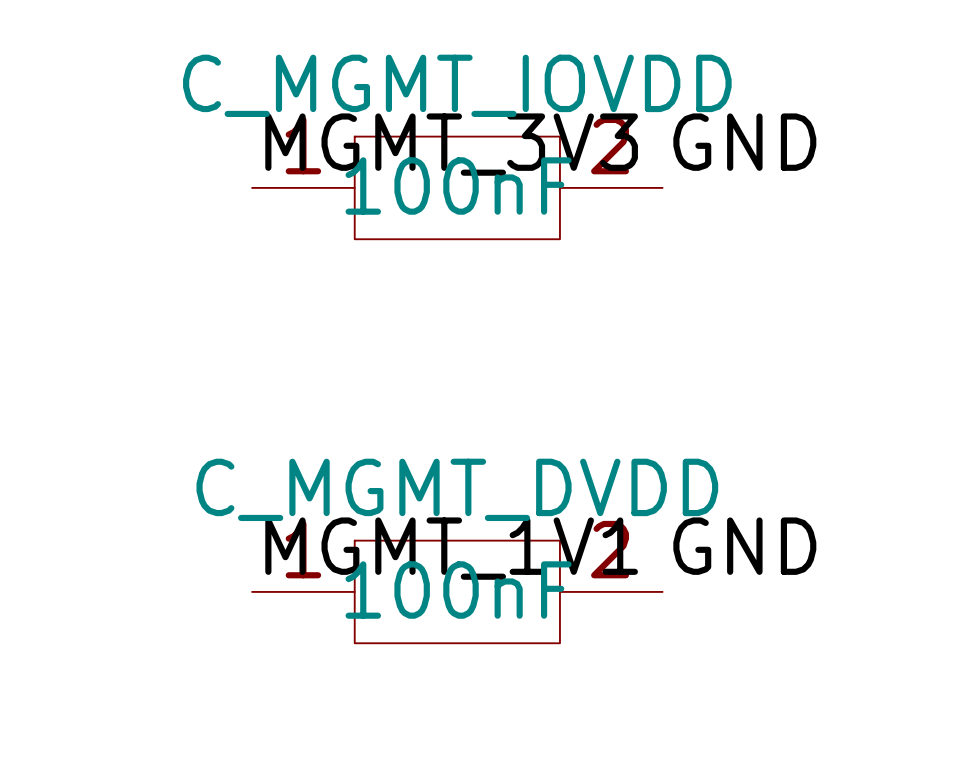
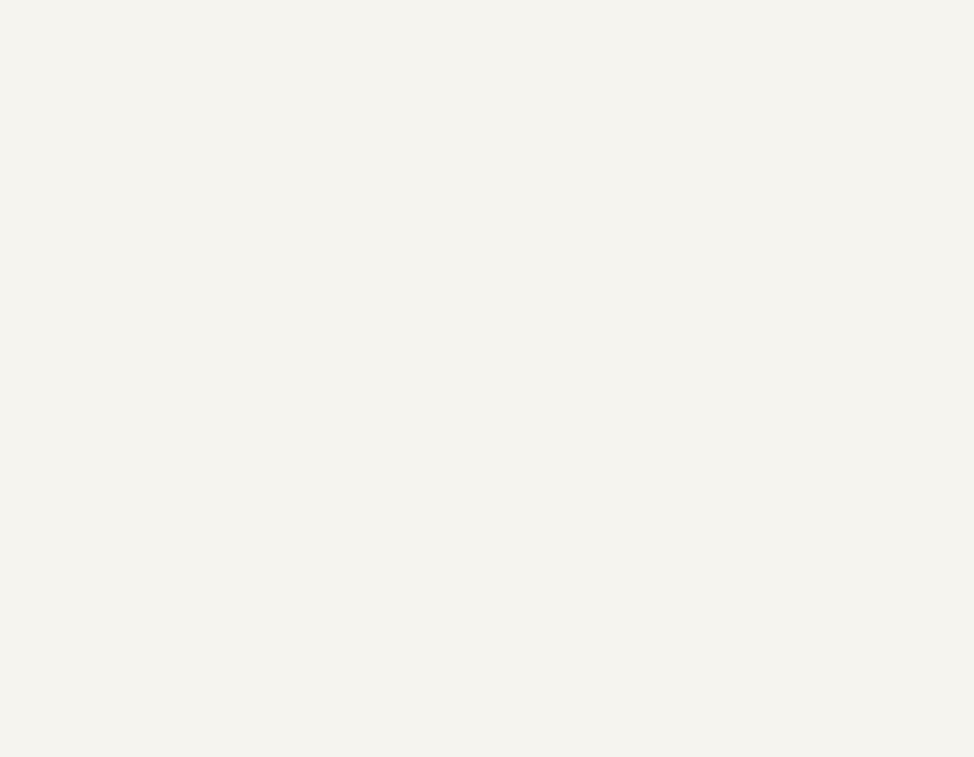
label: GND (744, 142) -> none
label: MGMT_3V3 (451, 144) -> none
C_MGMT_IOVDD: 100nF (457, 187) -> none
label: GND (744, 546) -> none
label: MGMT_1V1 (451, 548) -> none
C_MGMT_DVDD: 100nF (457, 591) -> none

